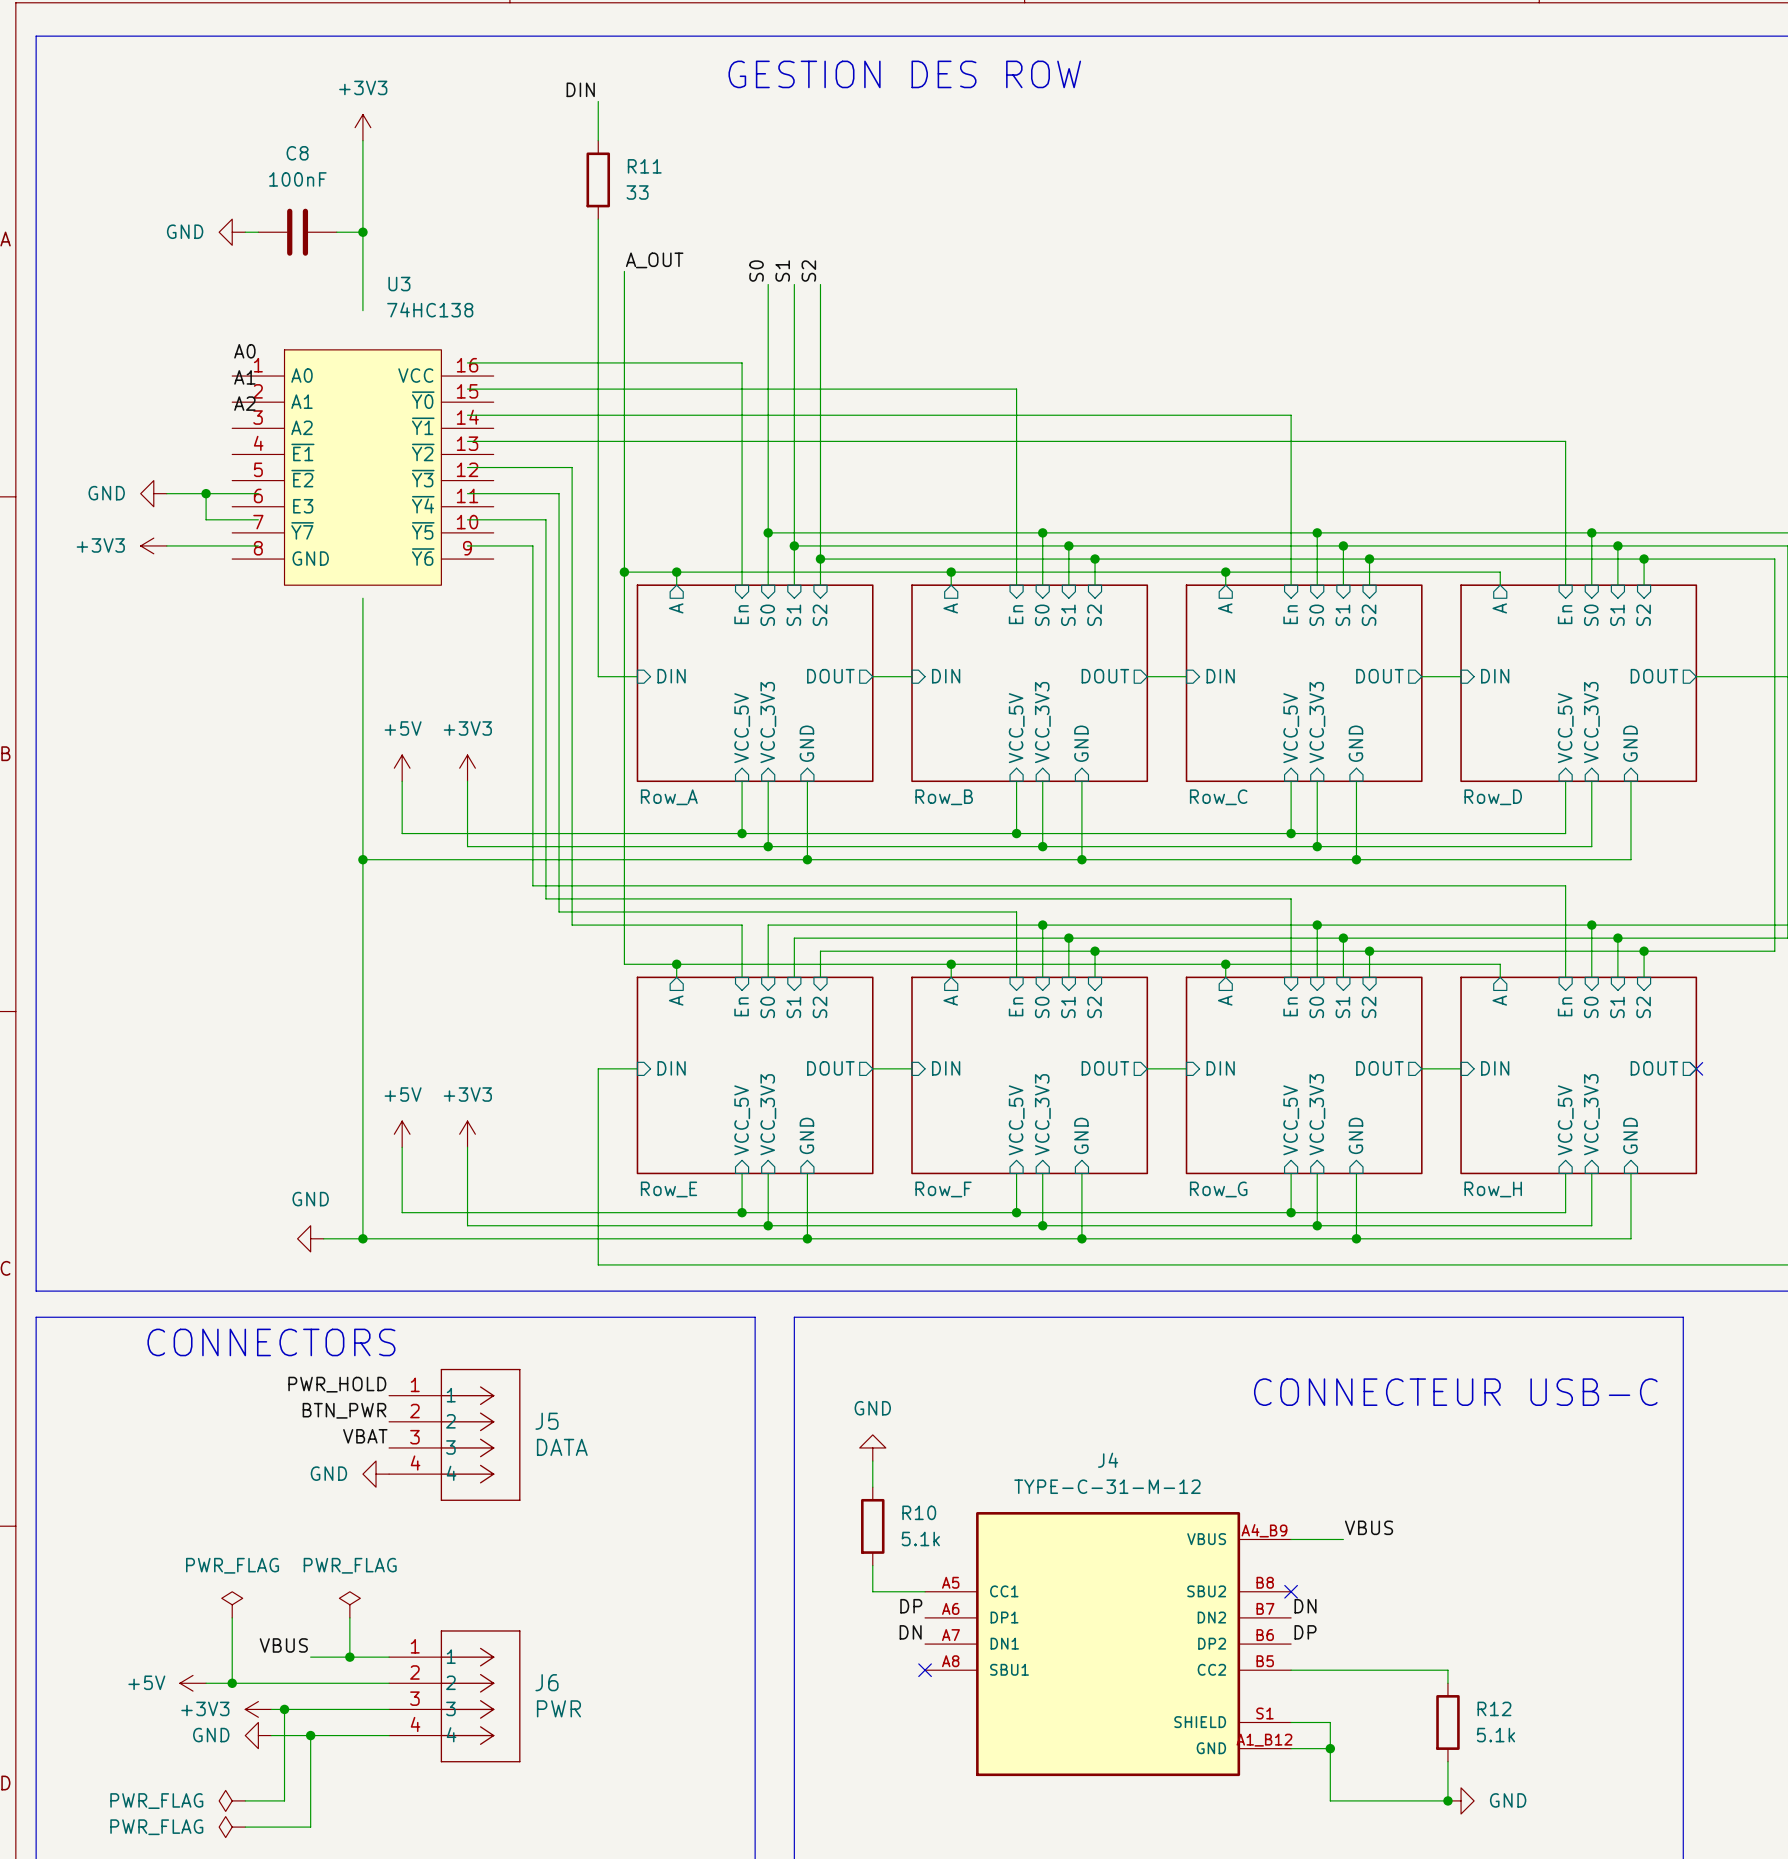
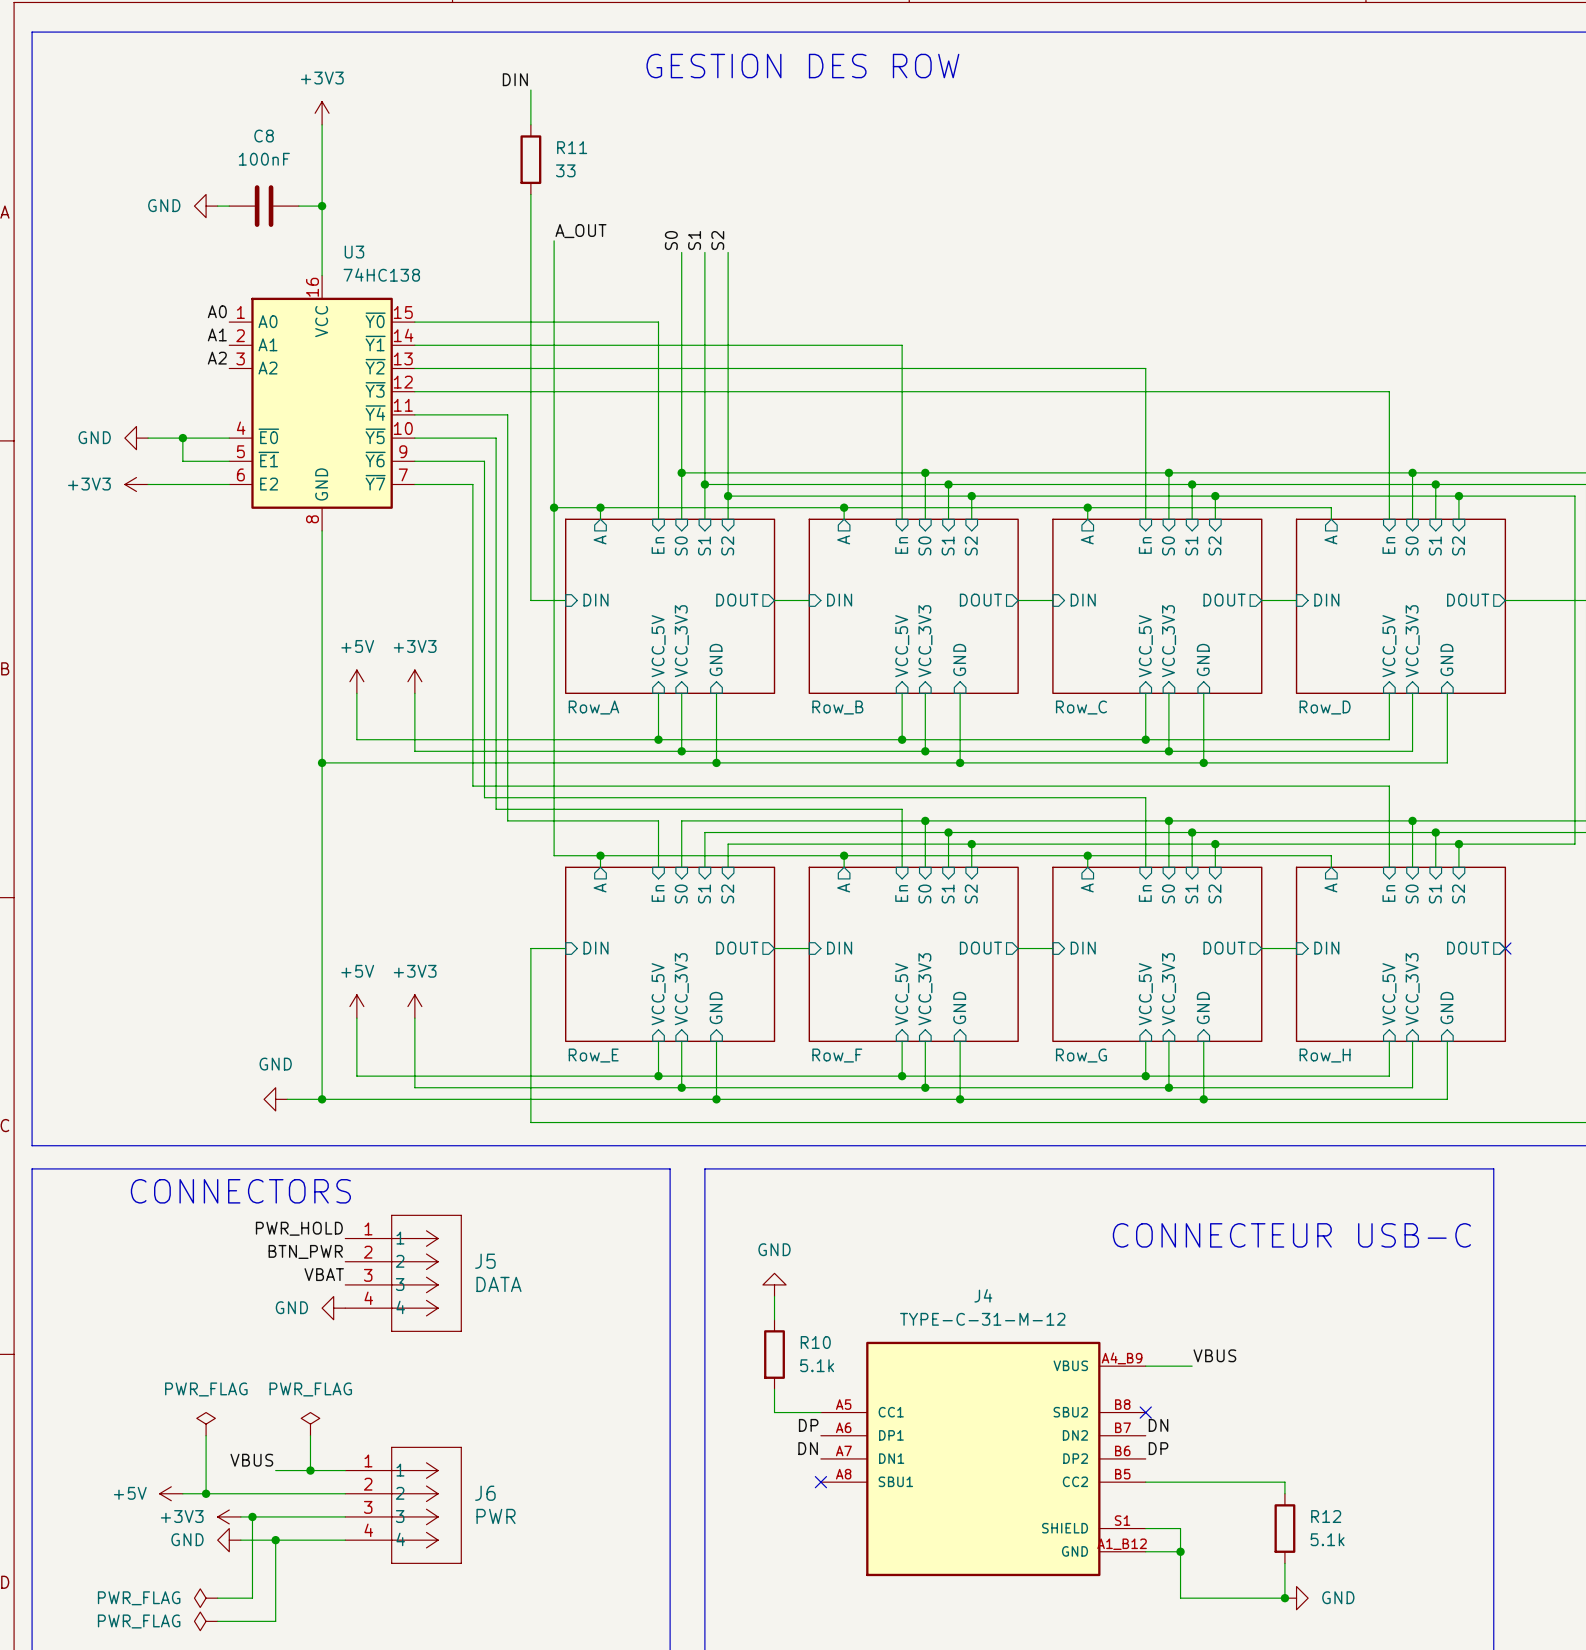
U3 symbol: [232, 349, 494, 586] -> [229, 275, 415, 531]

